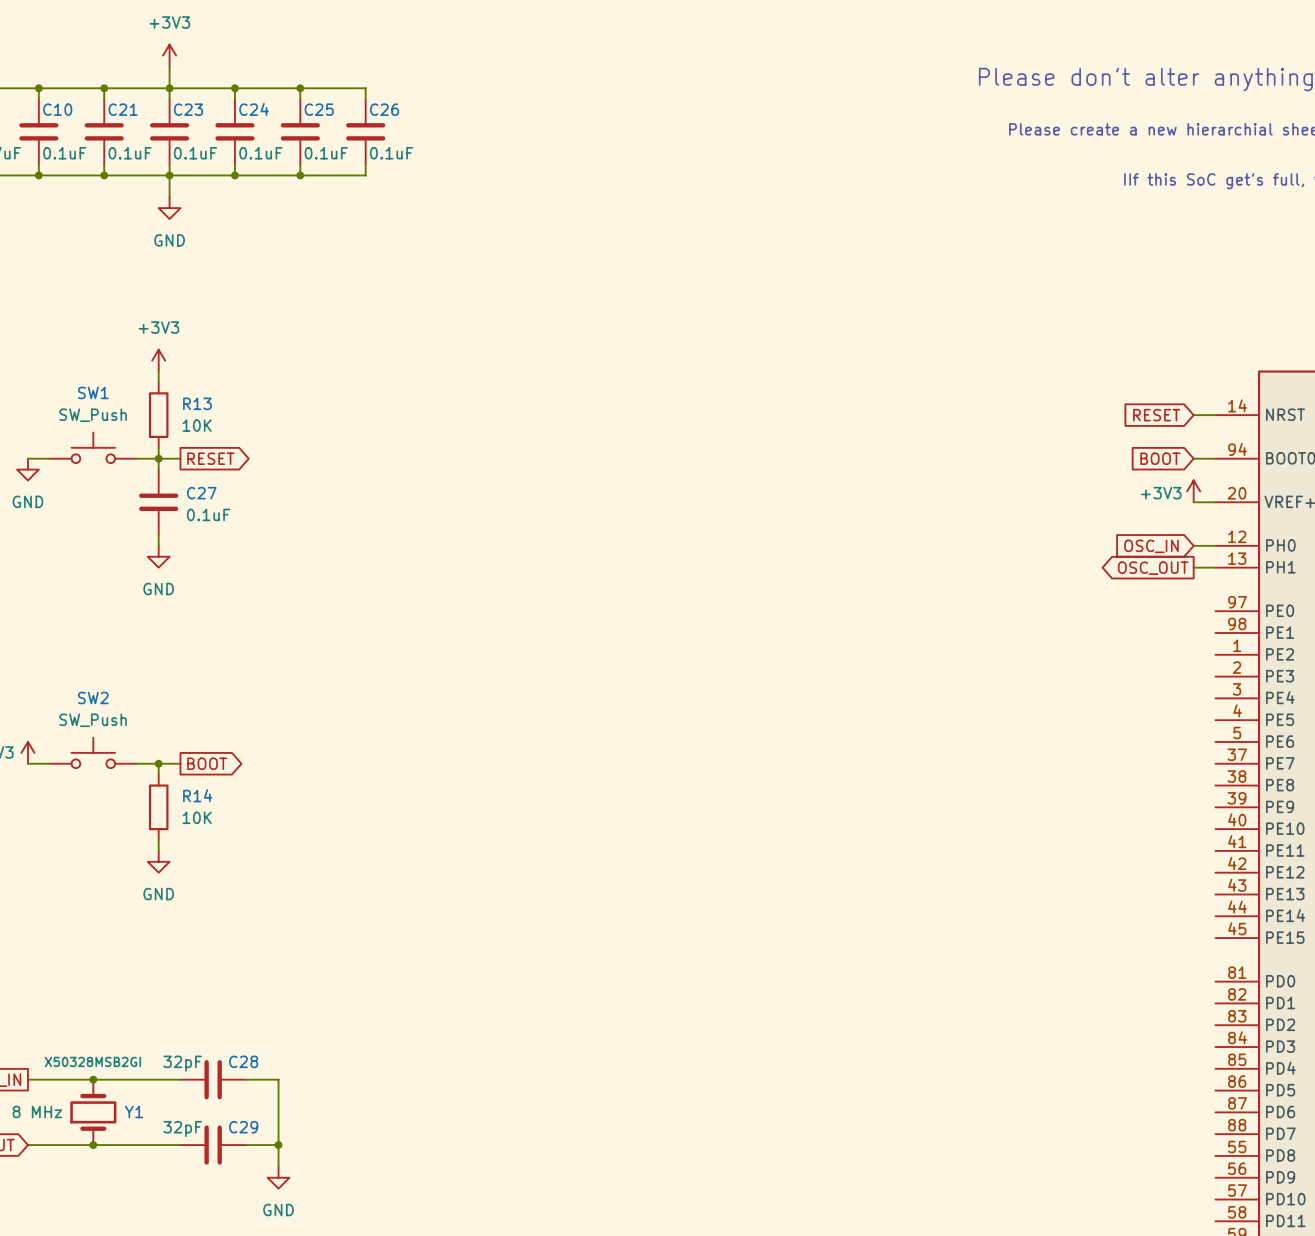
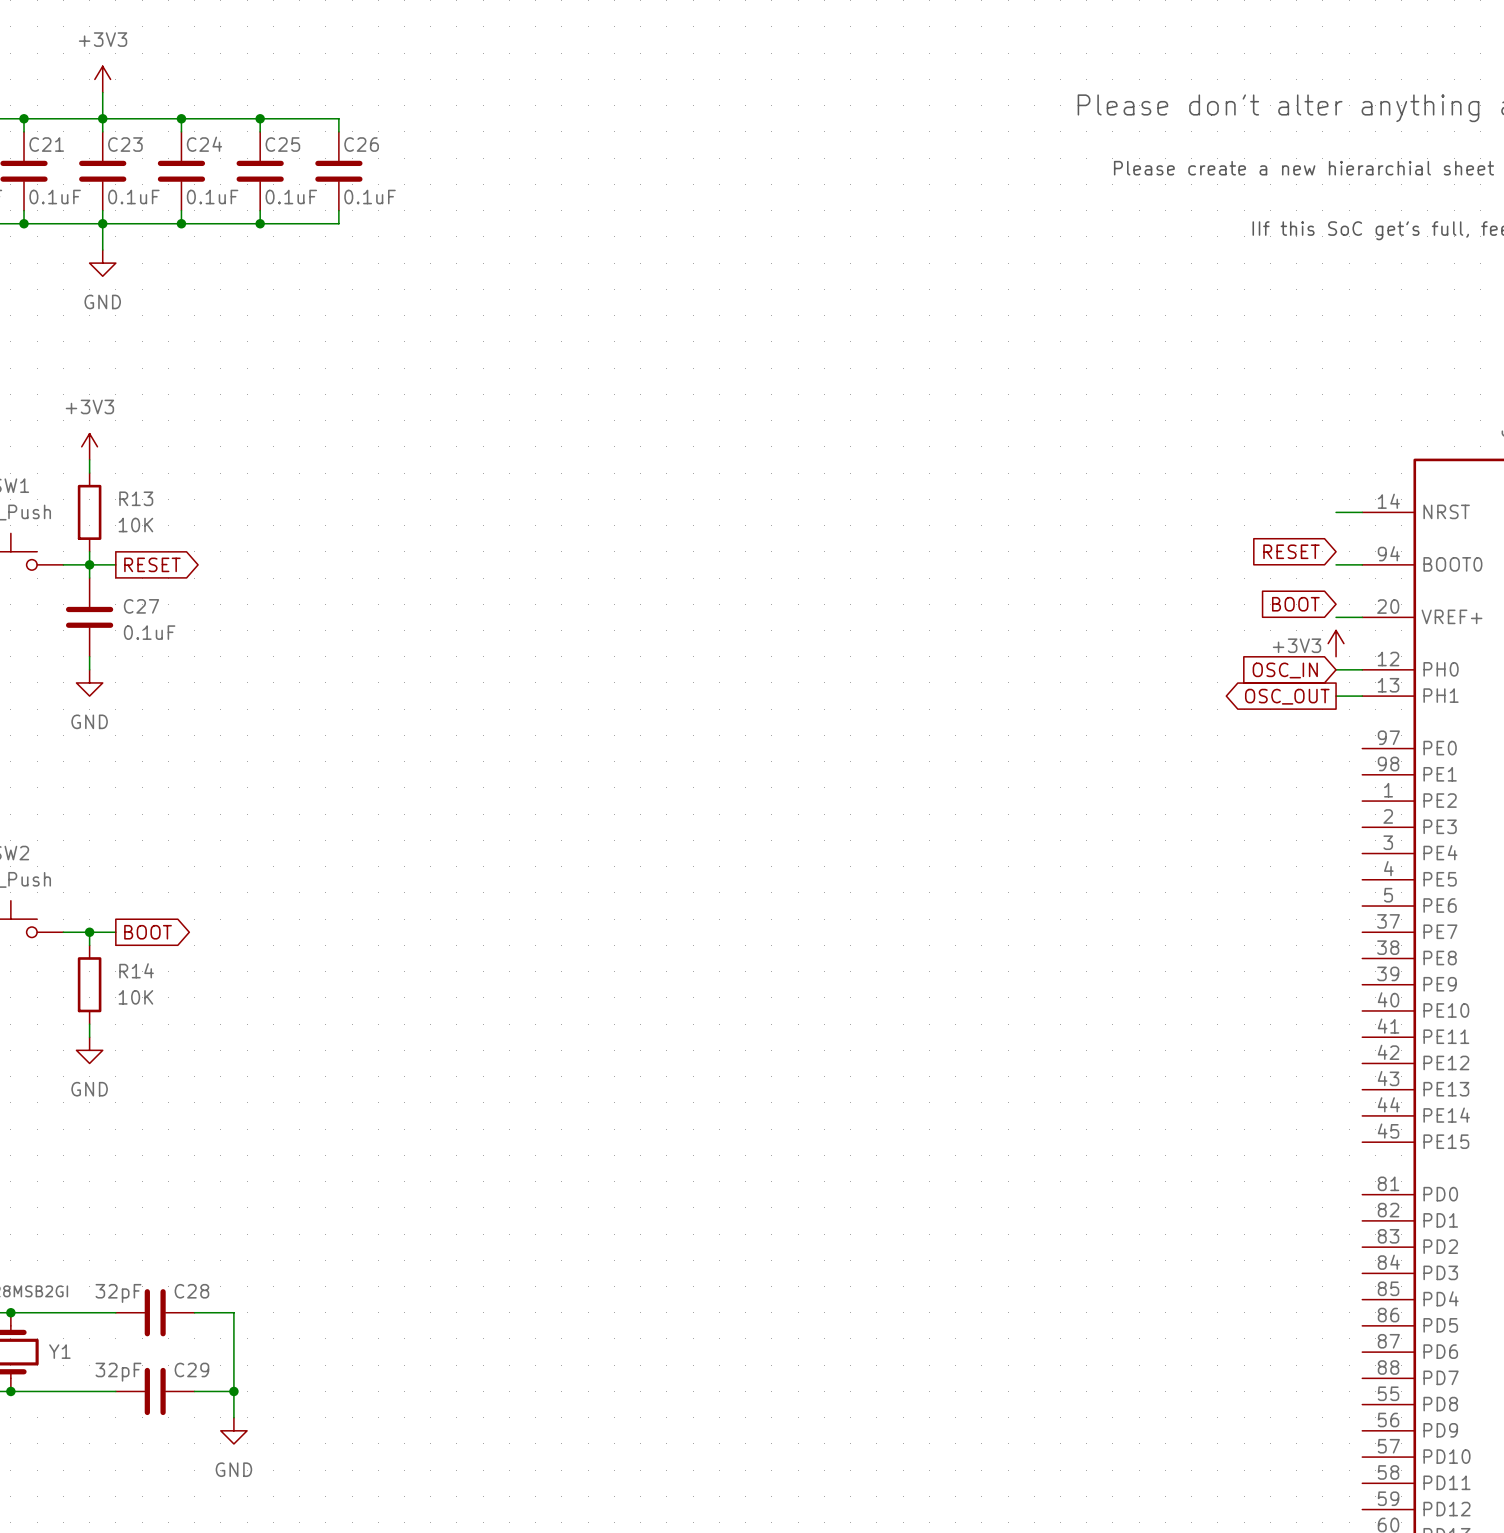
global label position: RESET (1156, 415) -> RESET (1291, 551)
global label position: BOOT (1160, 458) -> BOOT (1295, 604)
power symbol position: +3V3 (1193, 491) -> +3V3 (1336, 643)

